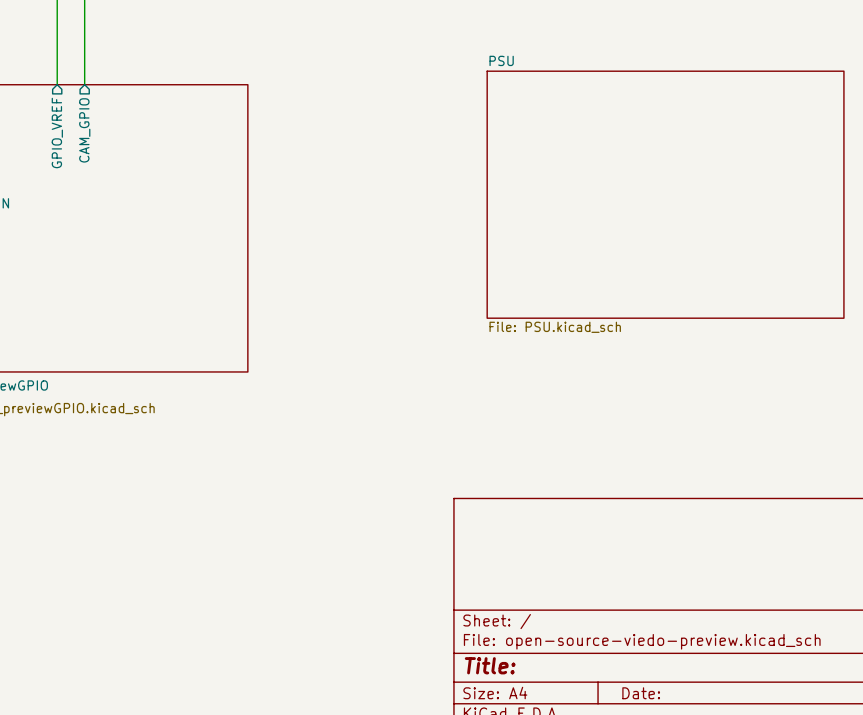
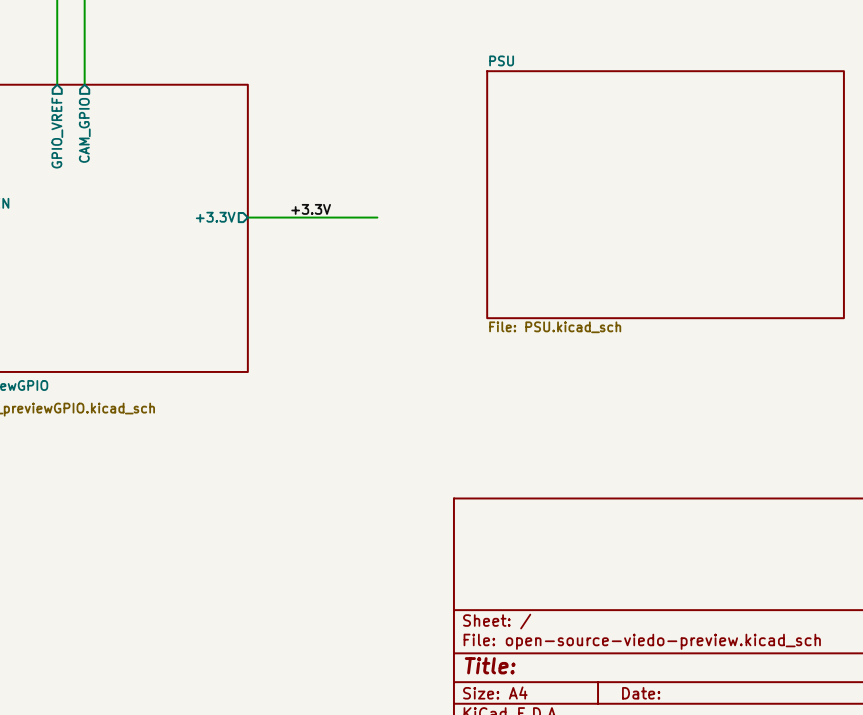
label: none -> +3.3V (311, 209)
sheet pin: none -> +3.3V (215, 217)
wire: none -> (249, 217) (377, 217)

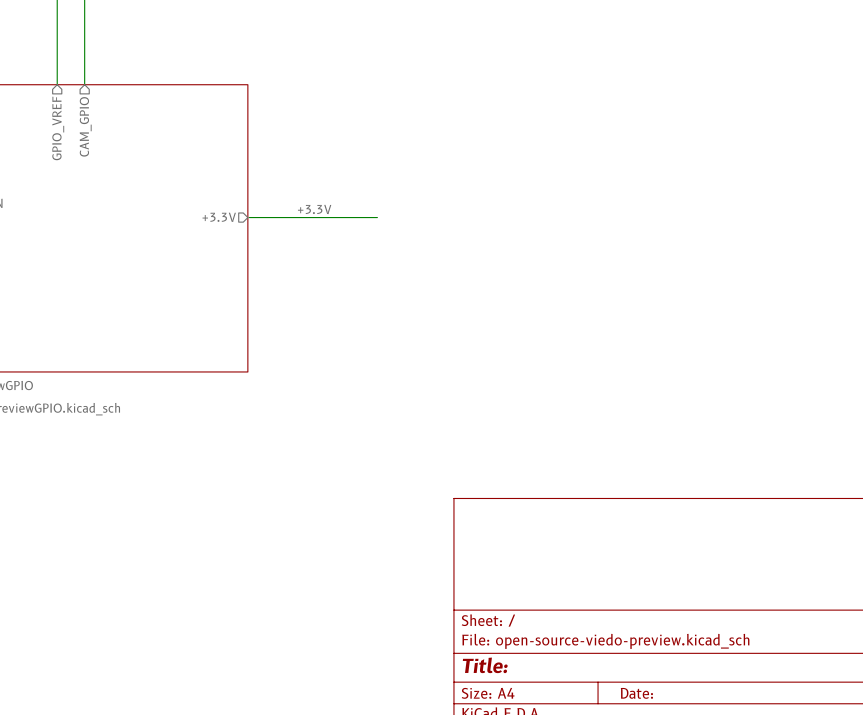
sheet PSU: File: PSU.kicad_sch (665, 194) -> none

